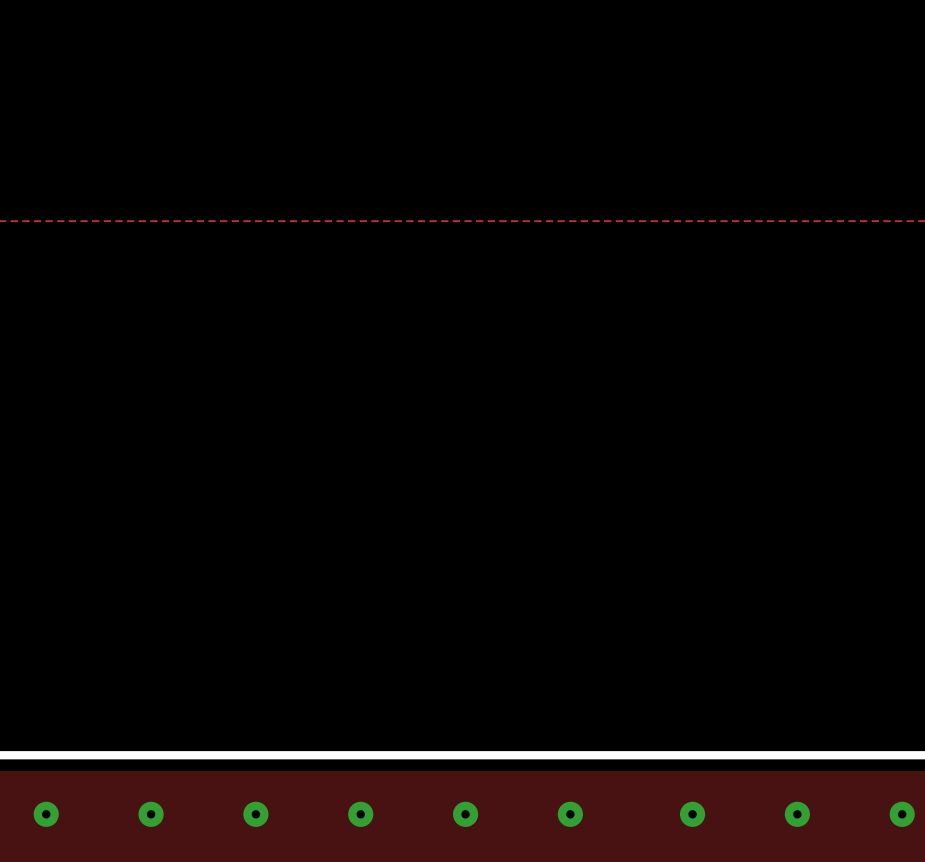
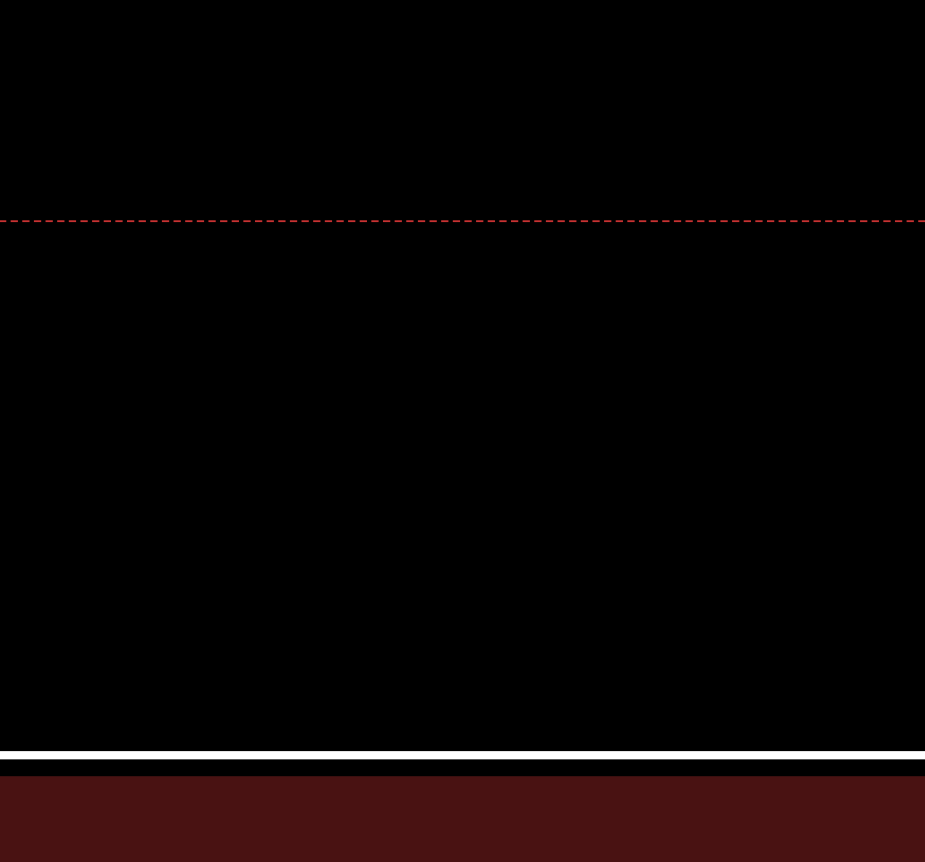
via: (46, 814) -> none
via: (151, 814) -> none
via: (255, 814) -> none
via: (360, 814) -> none
via: (465, 814) -> none
via: (570, 814) -> none
via: (692, 814) -> none
via: (797, 814) -> none
via: (902, 814) -> none

